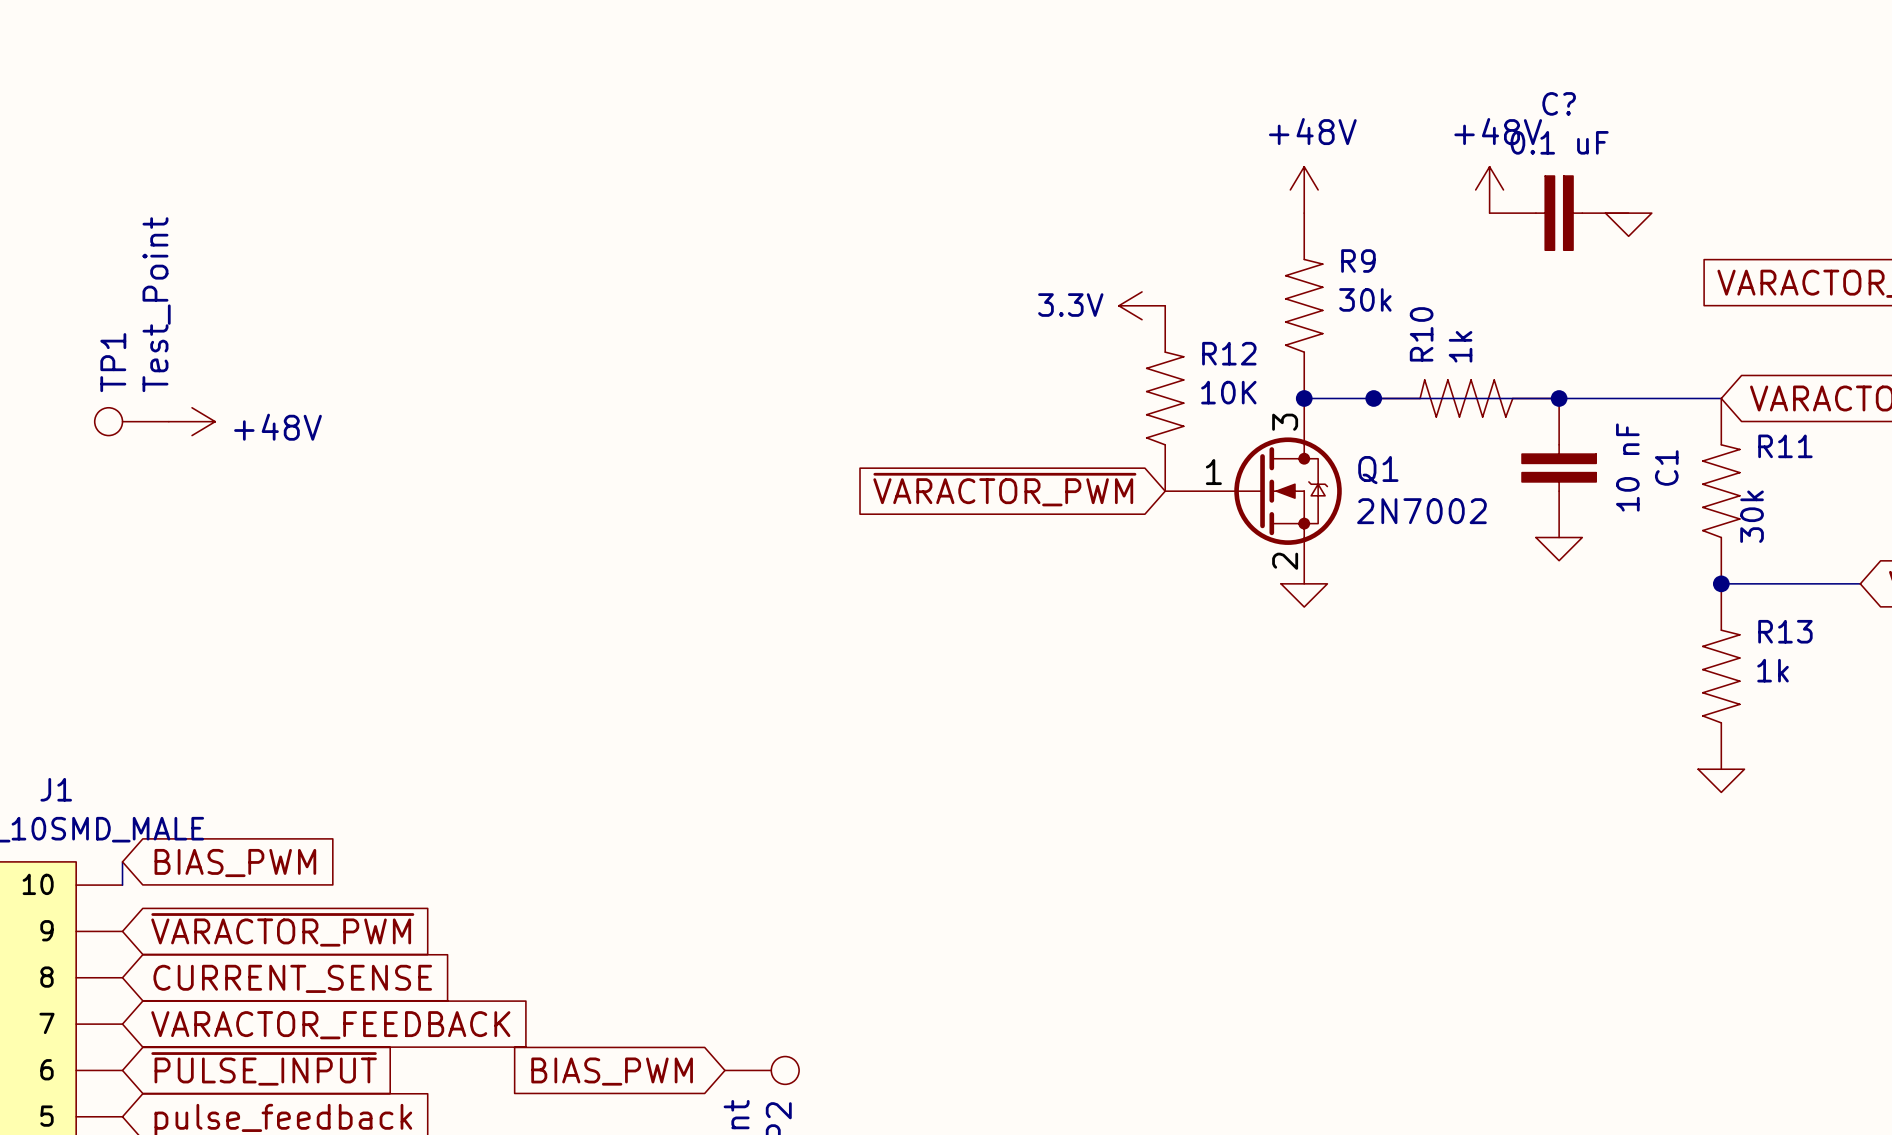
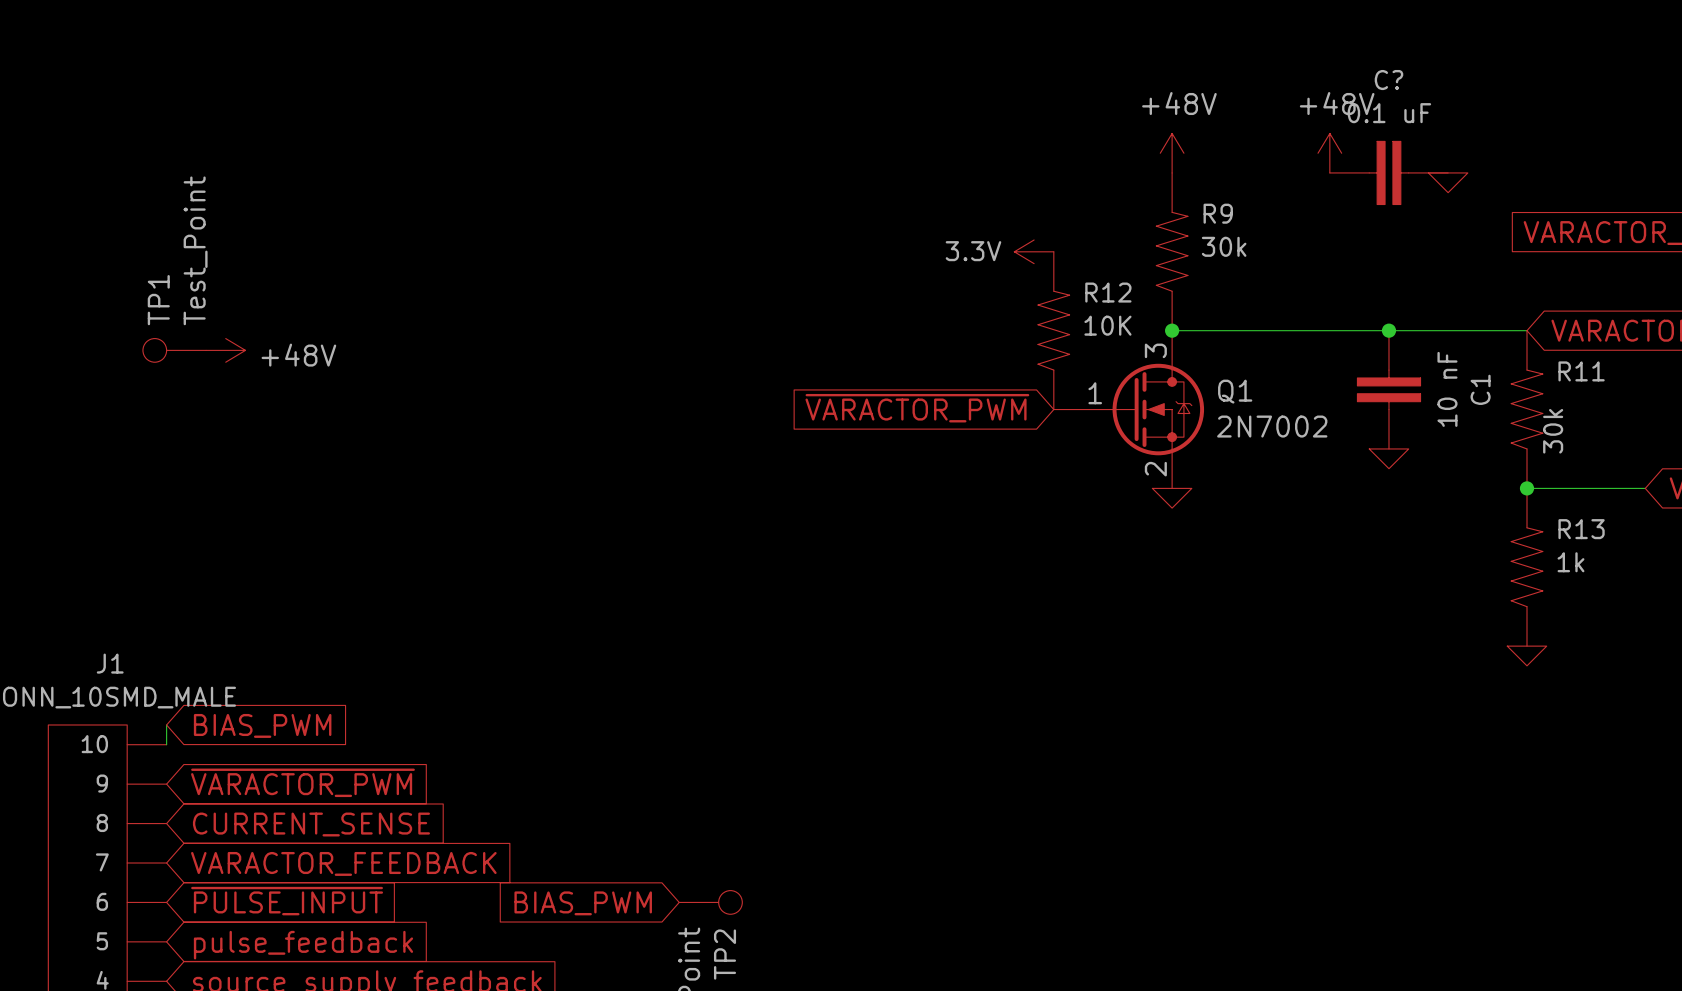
junction: (1373, 398) -> none
R10: 1k (1466, 398) -> none

